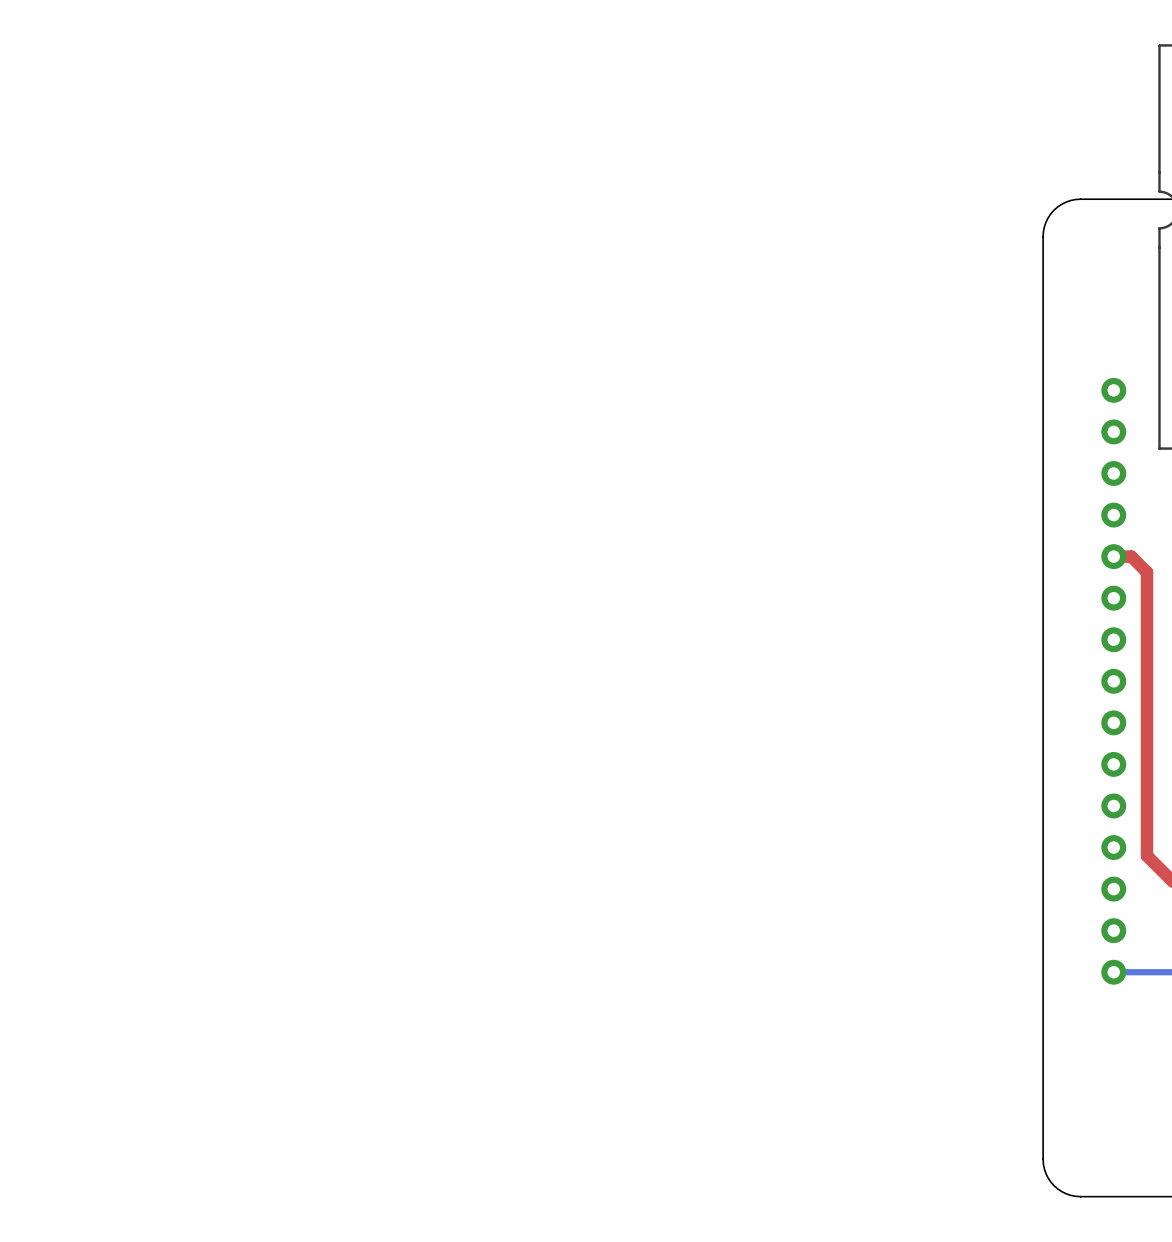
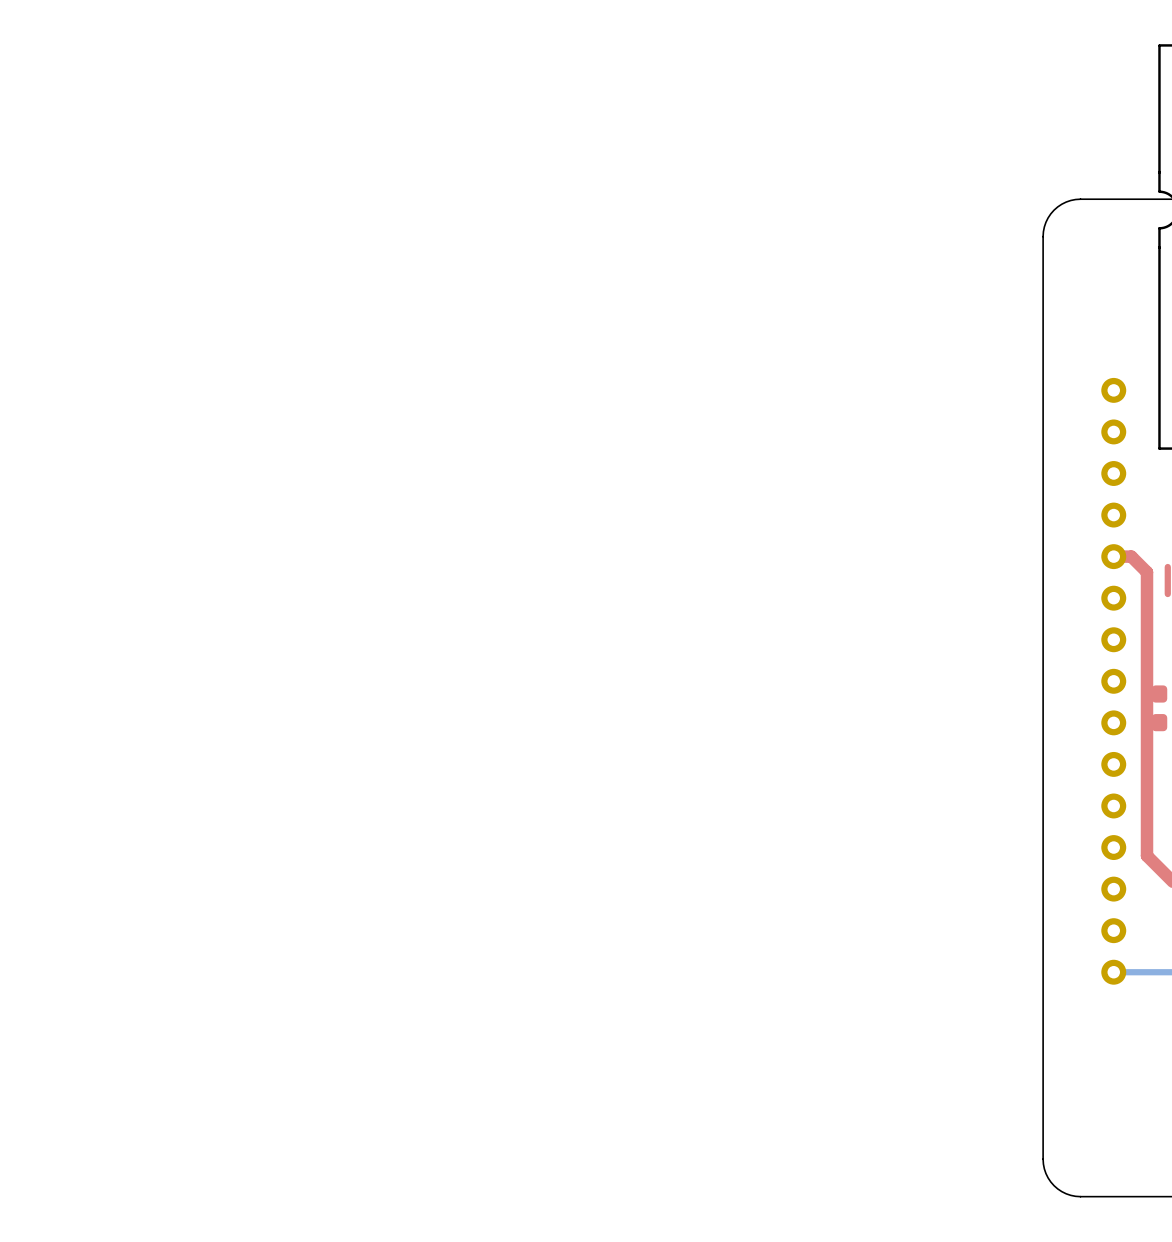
top track: none -> (1167, 567) (1167, 594)
part: none -> (1159, 708)

